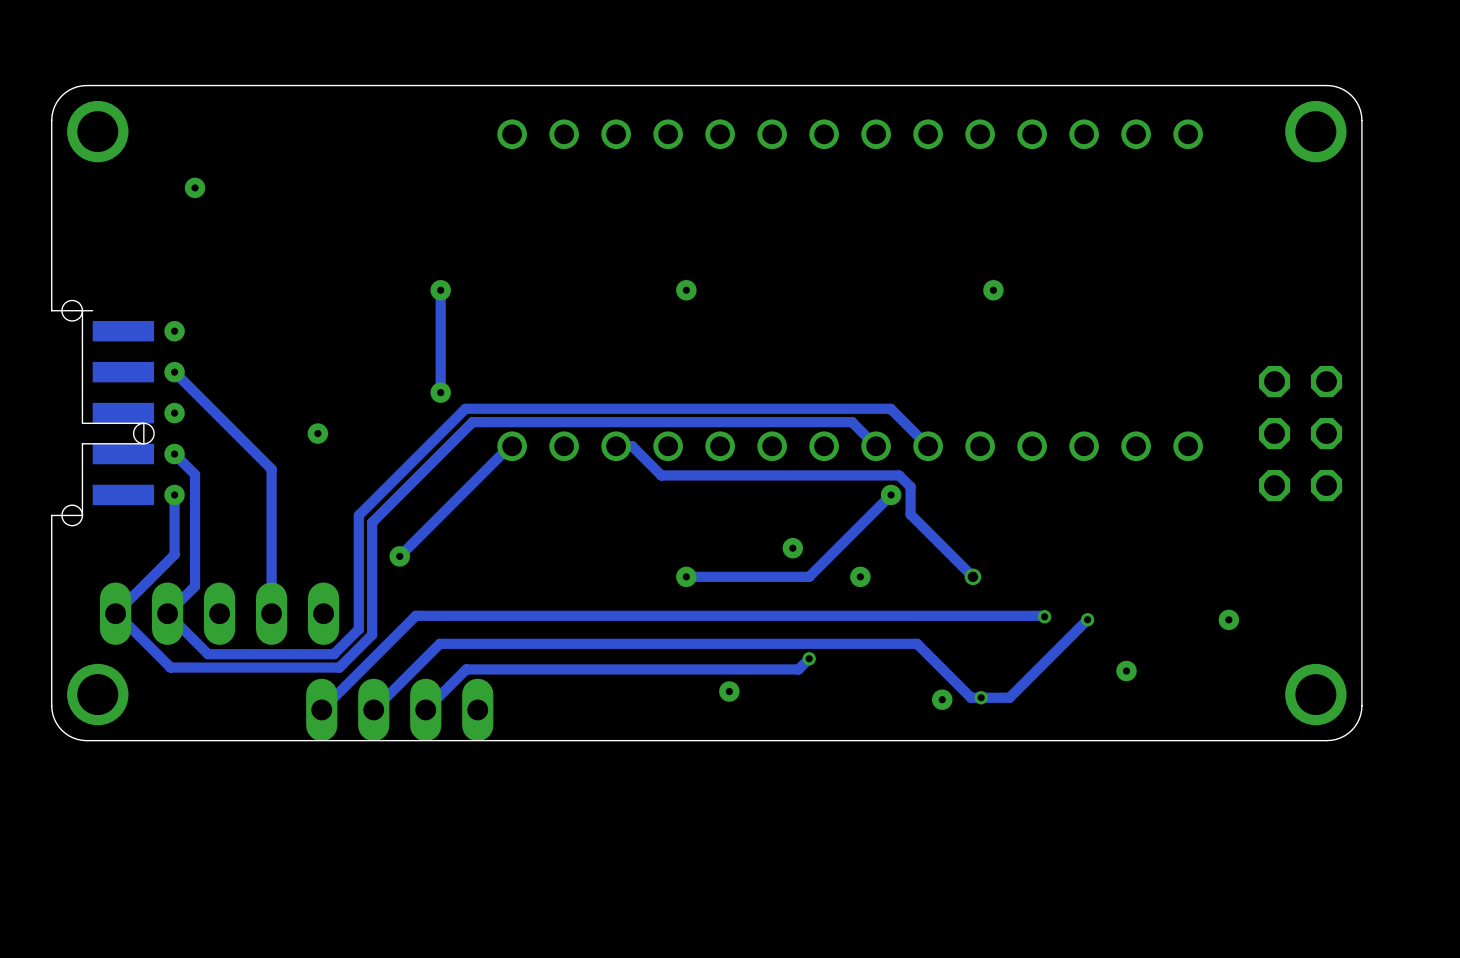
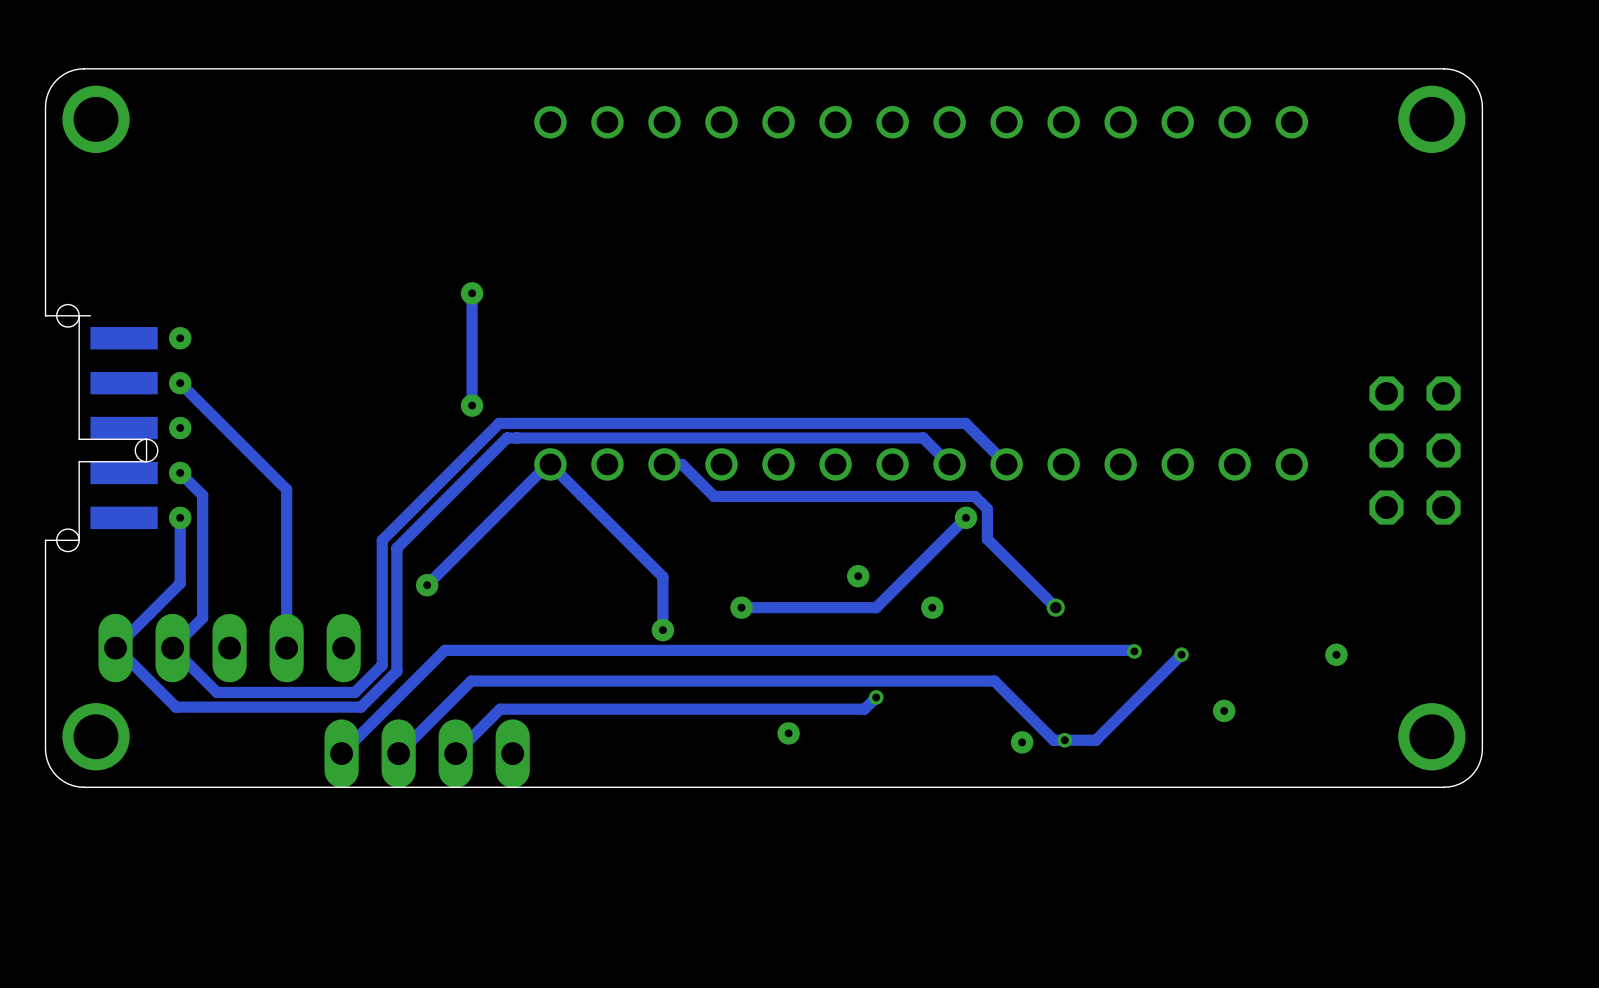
via: (195, 187) -> none
via: (686, 290) -> none
via: (993, 290) -> none
via: (317, 433) -> none
track: none -> (550, 464) (662, 576) (662, 630)
via: none -> (662, 630)

